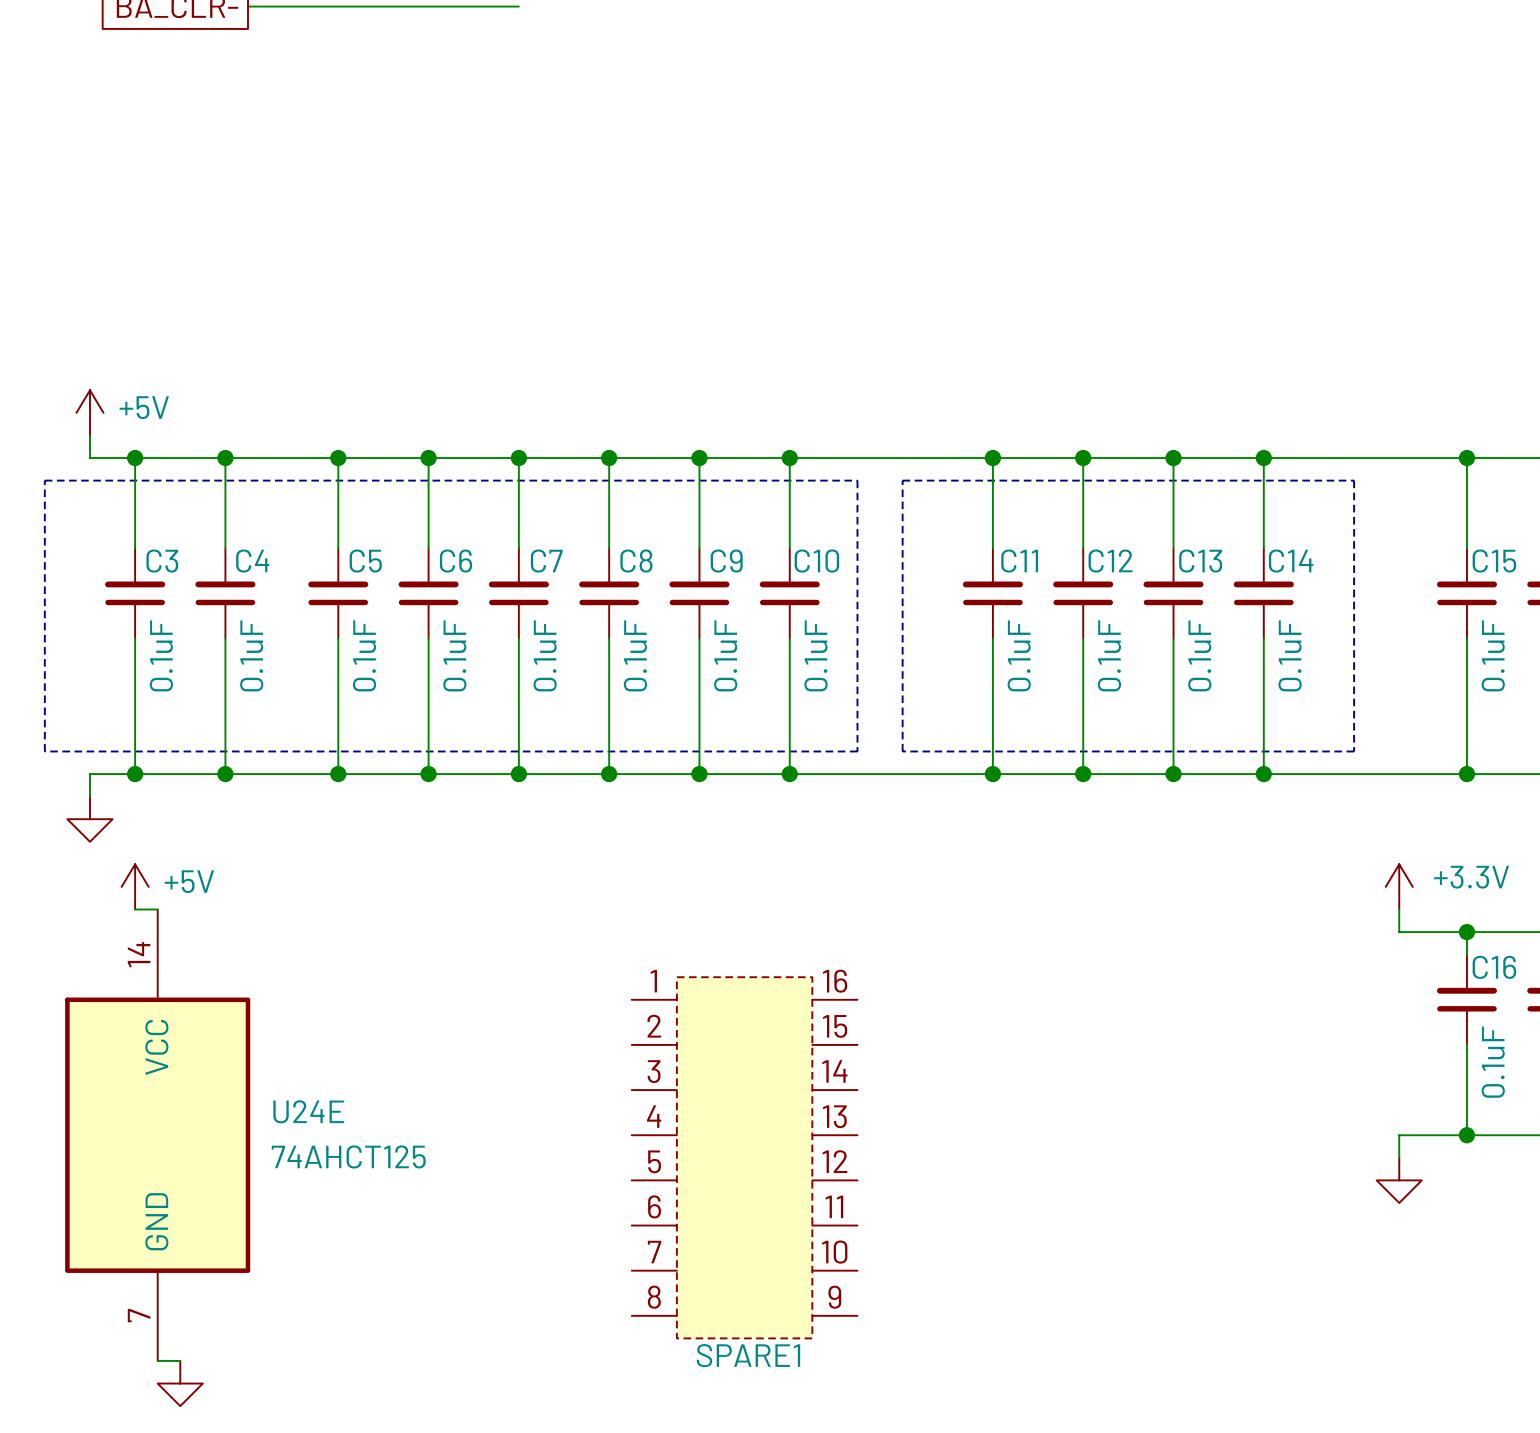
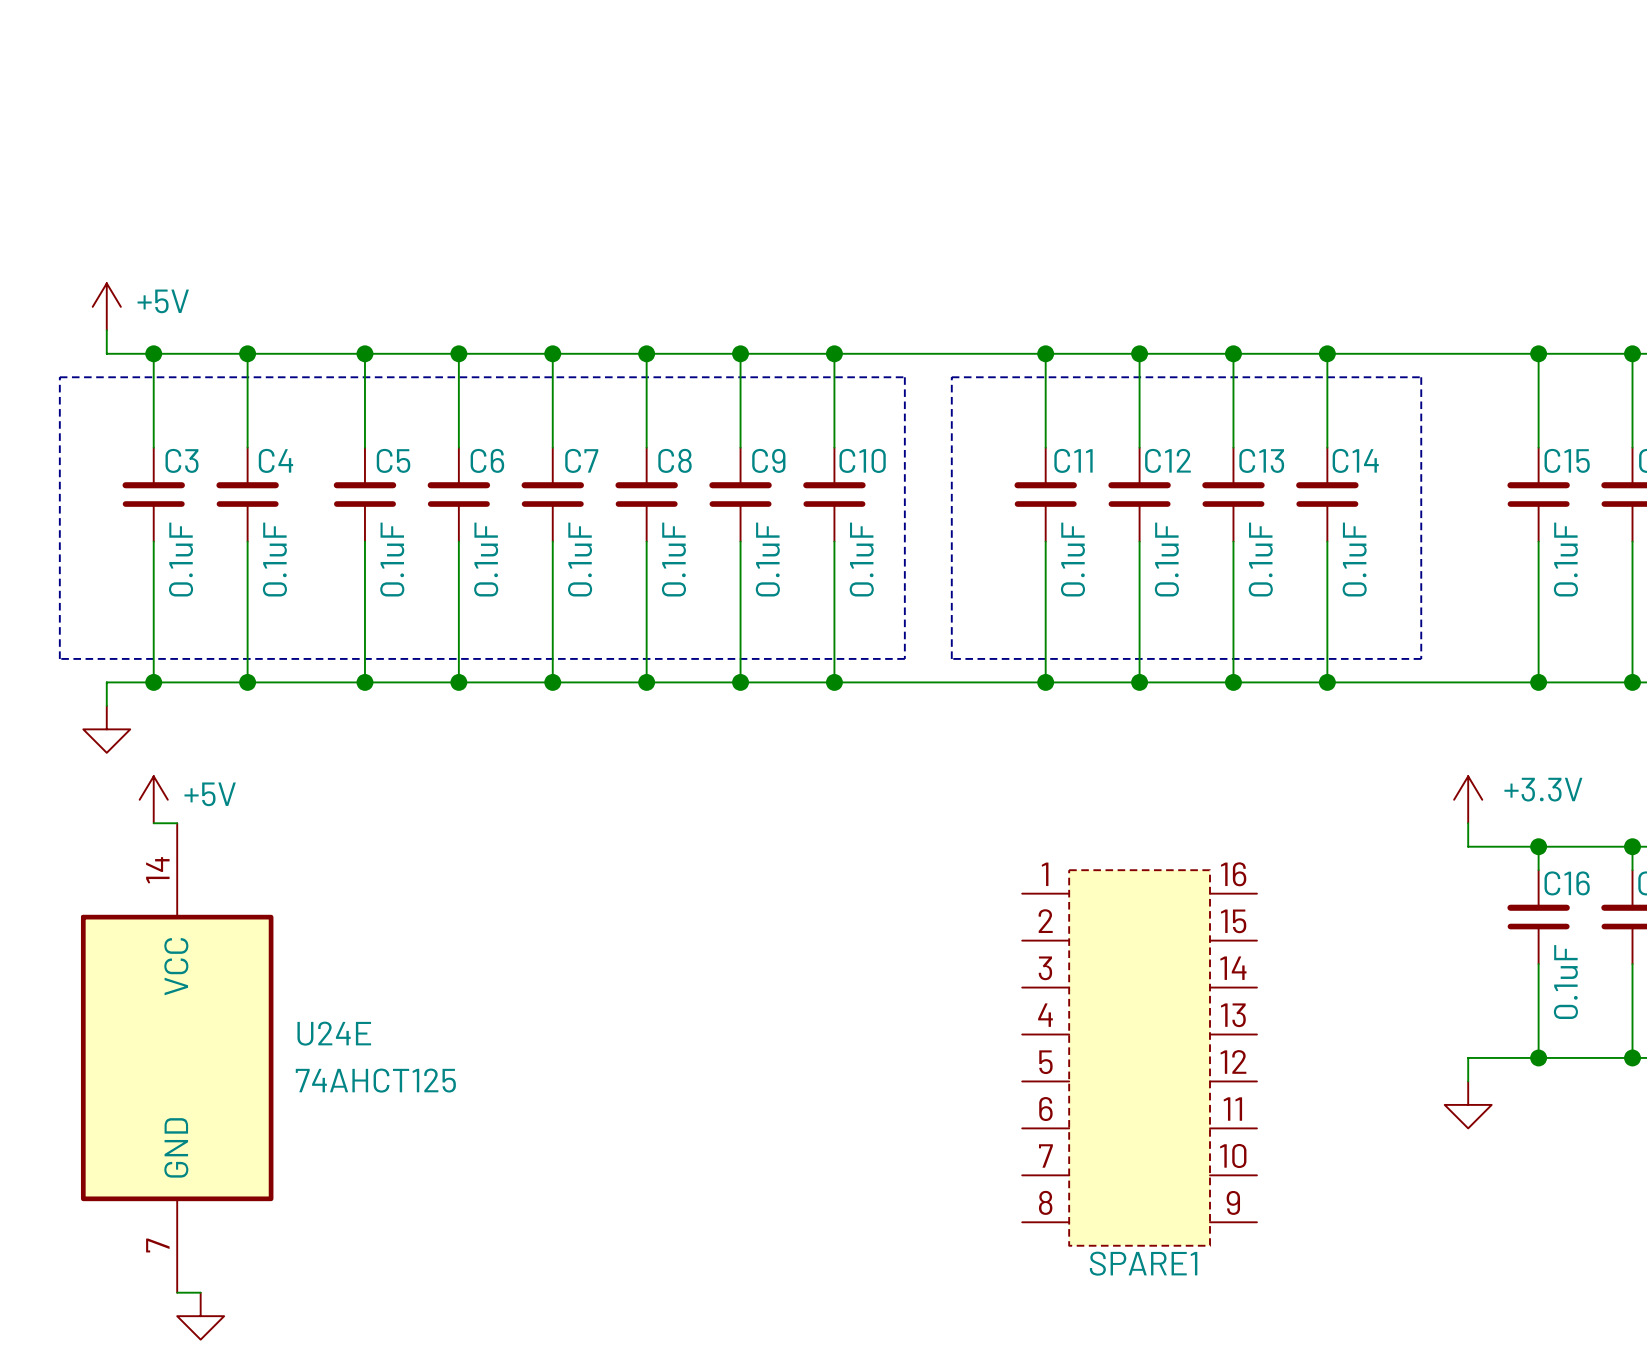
SPARE1 position: (744, 1157) -> (1139, 1057)

